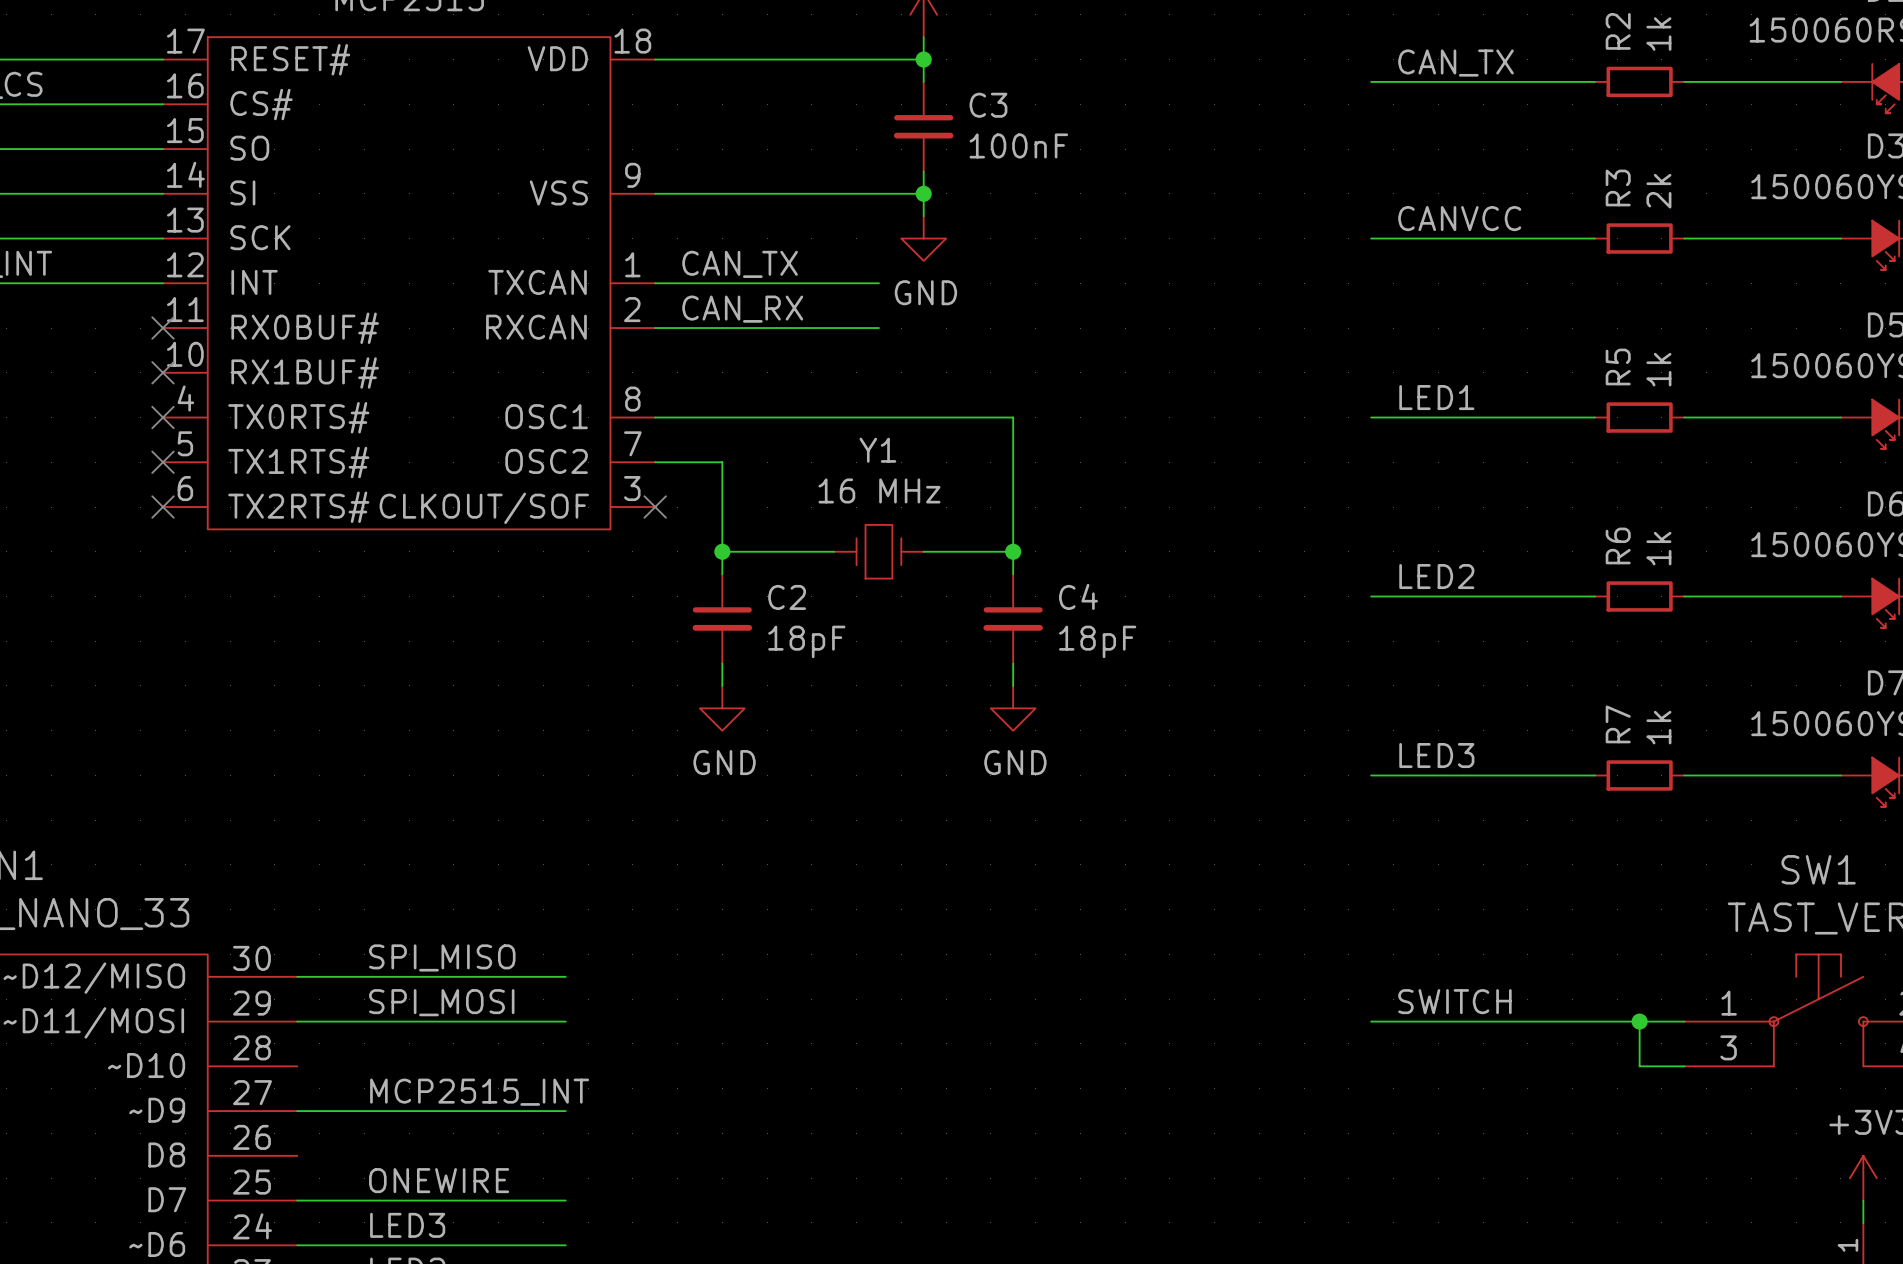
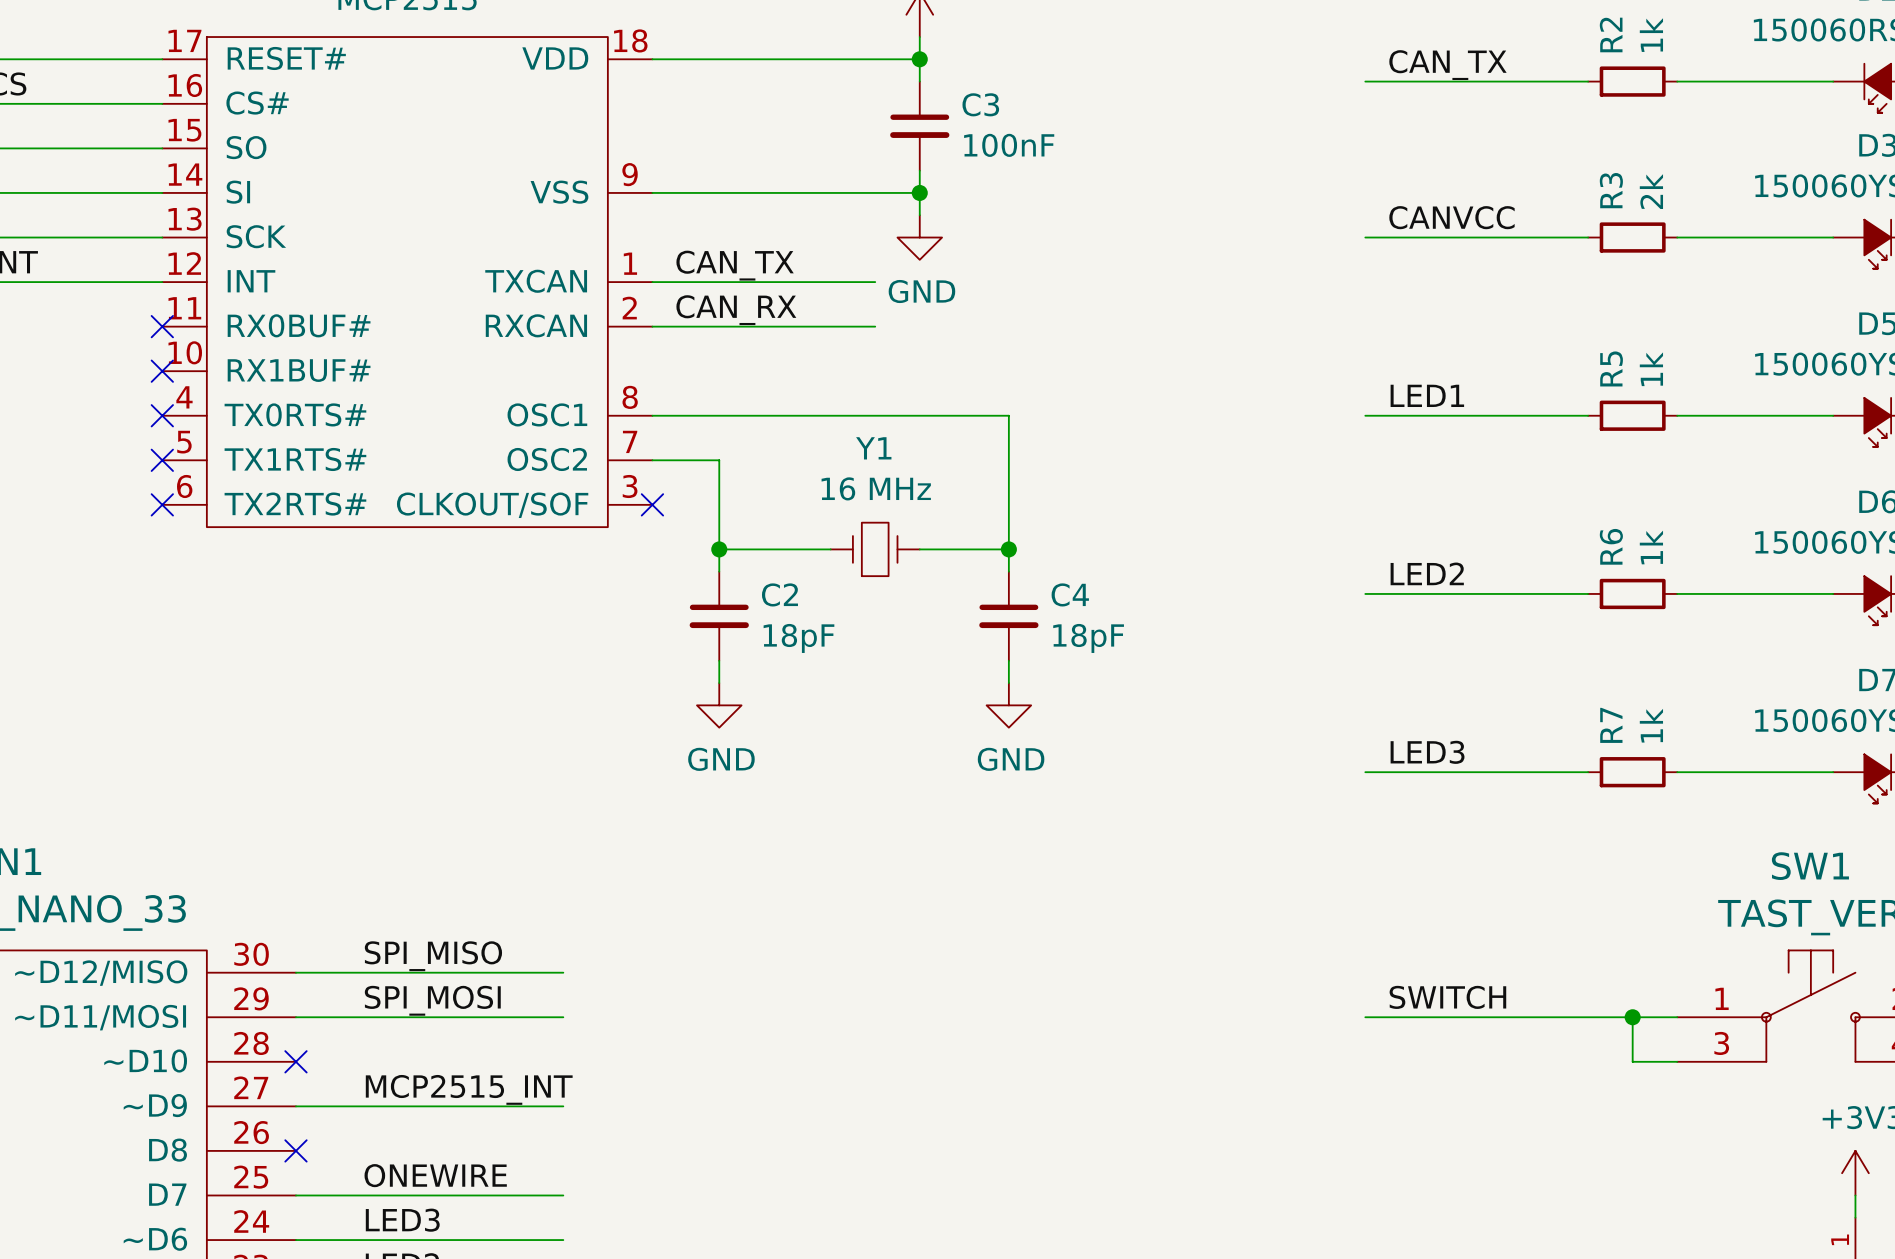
no-connect mark: none -> (295, 1061)
no-connect mark: none -> (295, 1150)

